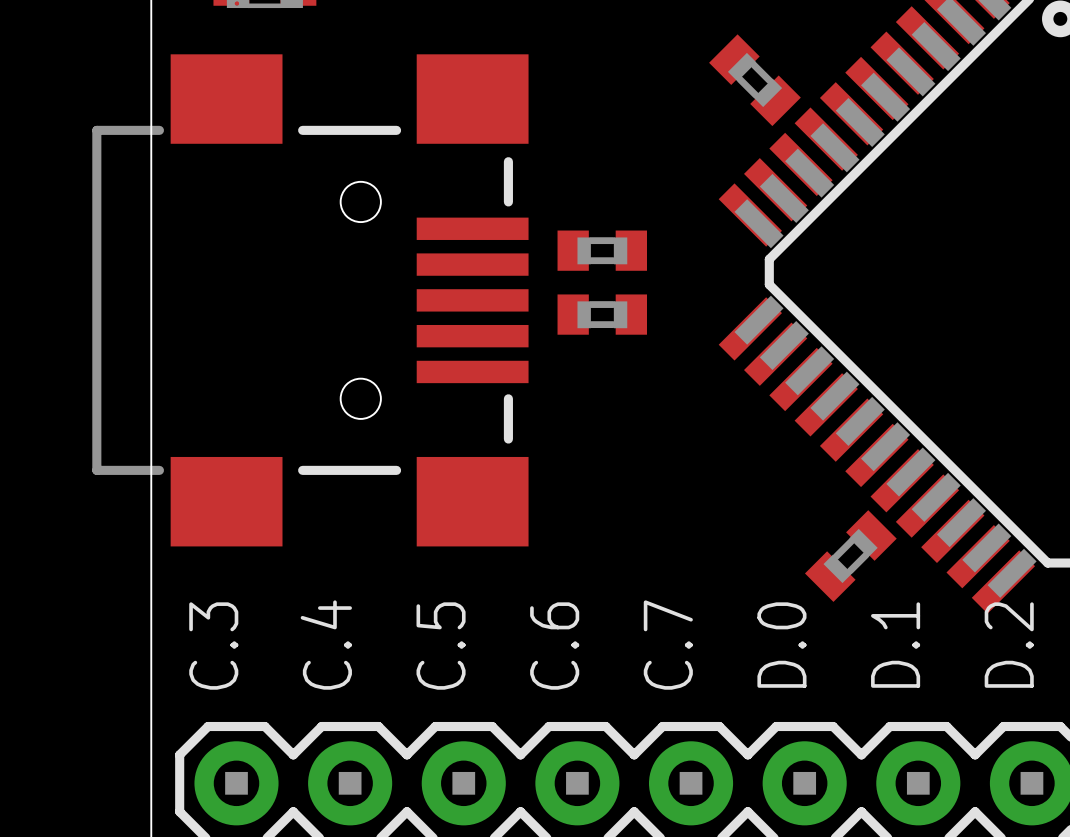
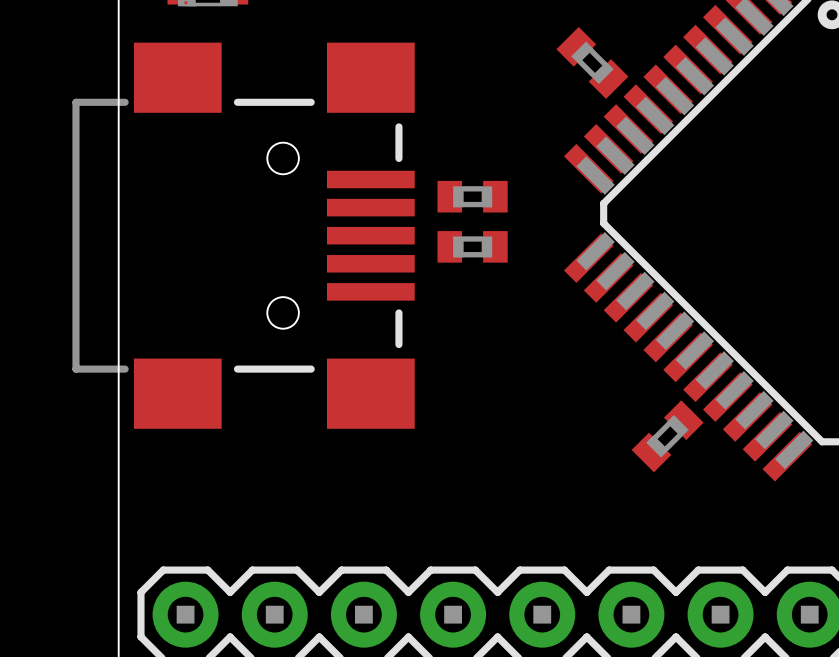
text: C.4 (326, 645) -> none
text: C.7 (668, 645) -> none
text: D.0 (781, 645) -> none
text: D.1 (895, 645) -> none
text: D.2 (1009, 645) -> none
text: C.3 (213, 646) -> none
text: C.5 (441, 646) -> none
text: C.6 (554, 646) -> none

